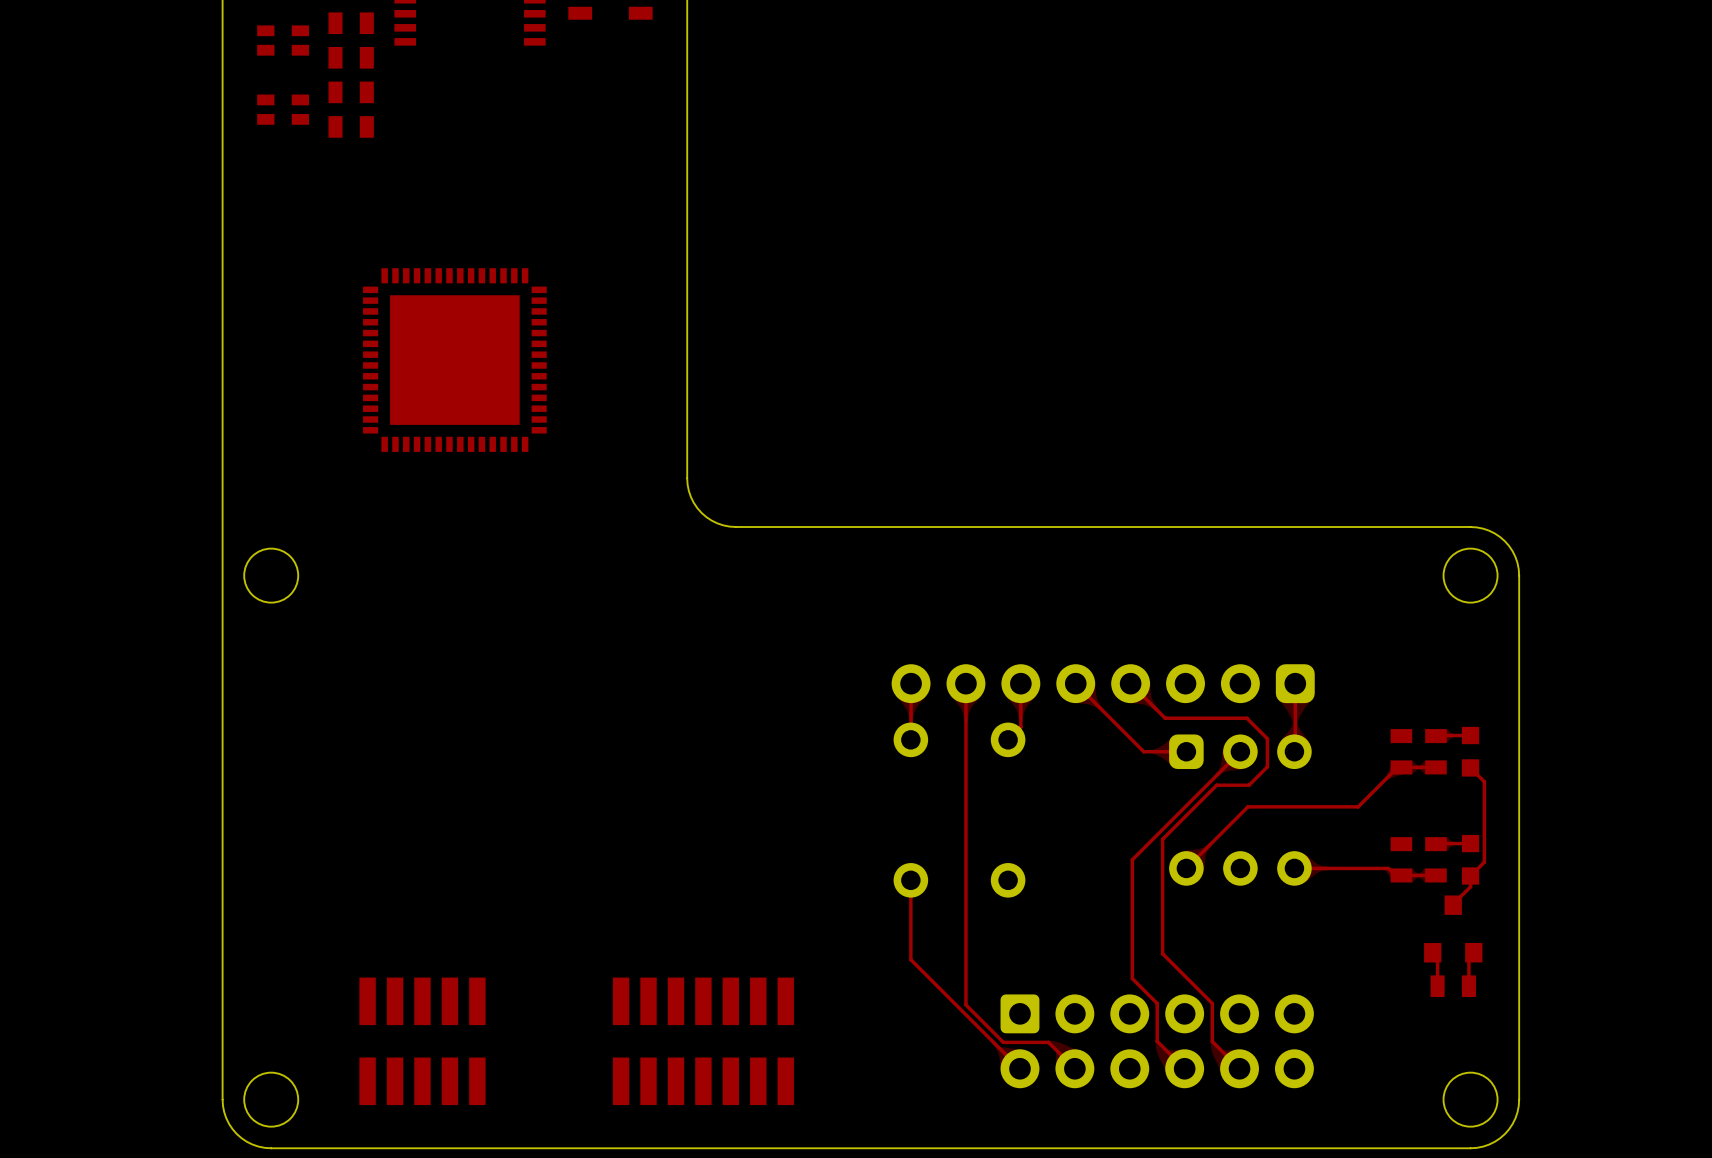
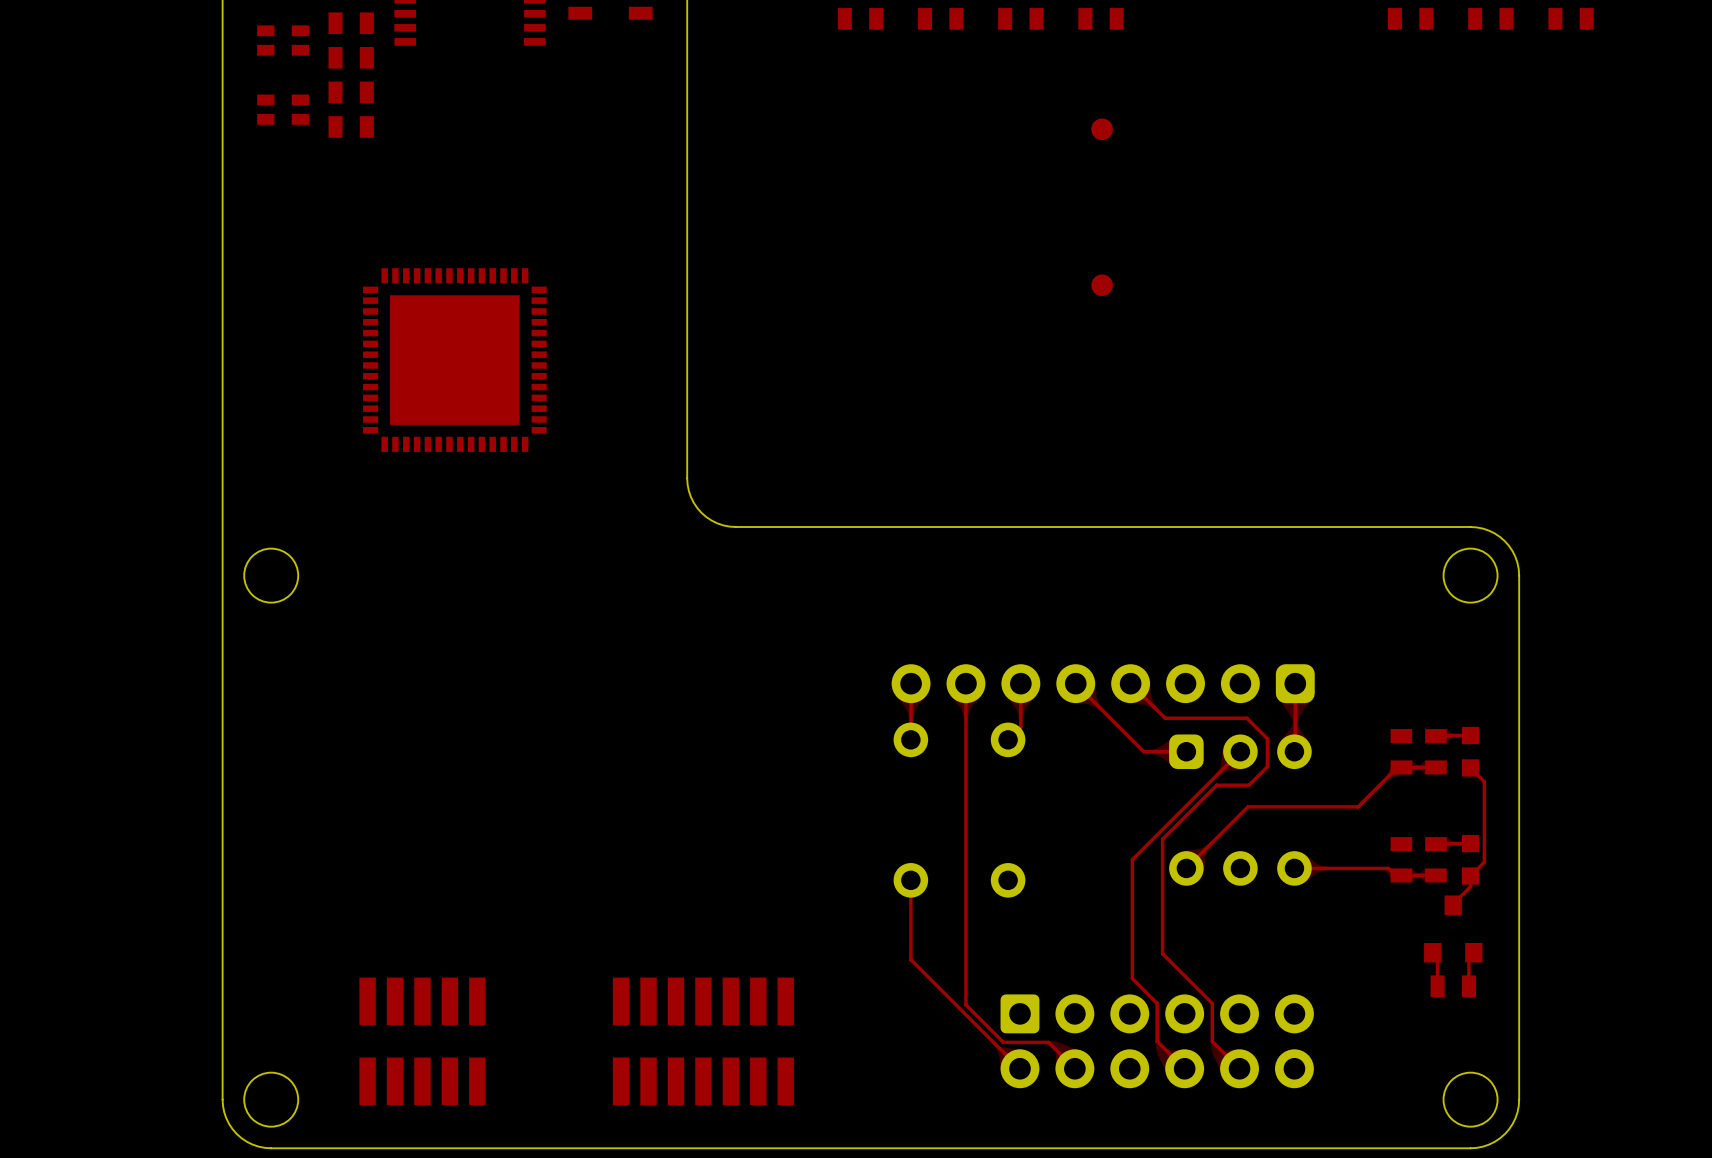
part: none -> (860, 18)
part: none -> (940, 18)
part: none -> (1020, 18)
part: none -> (1101, 18)
part: none -> (1410, 18)
part: none -> (1490, 18)
part: none -> (1571, 18)
part: none -> (1102, 129)
part: none -> (1102, 285)

